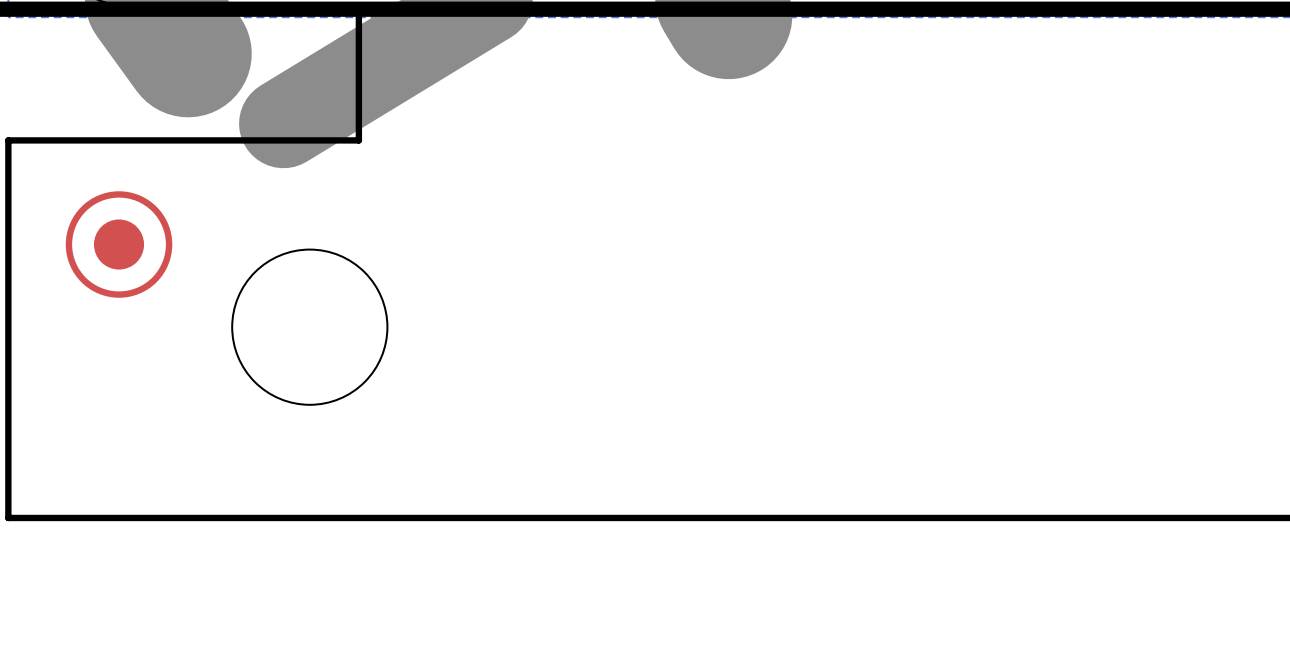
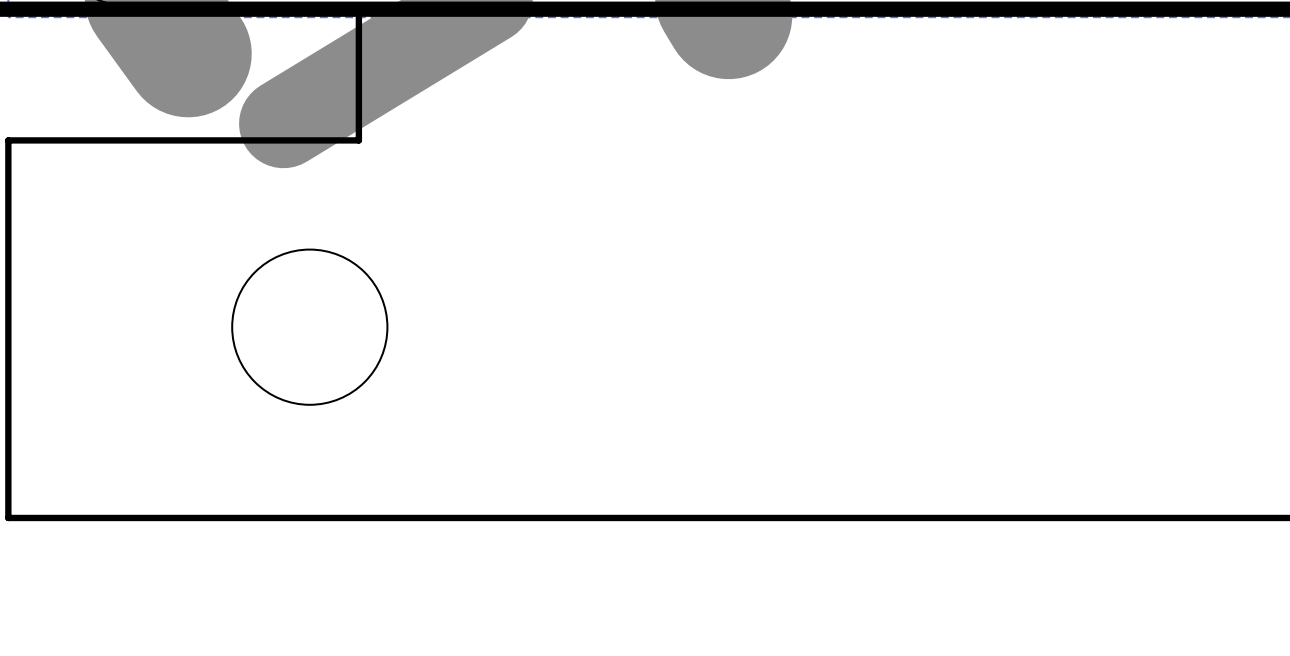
part: (119, 244) -> none

